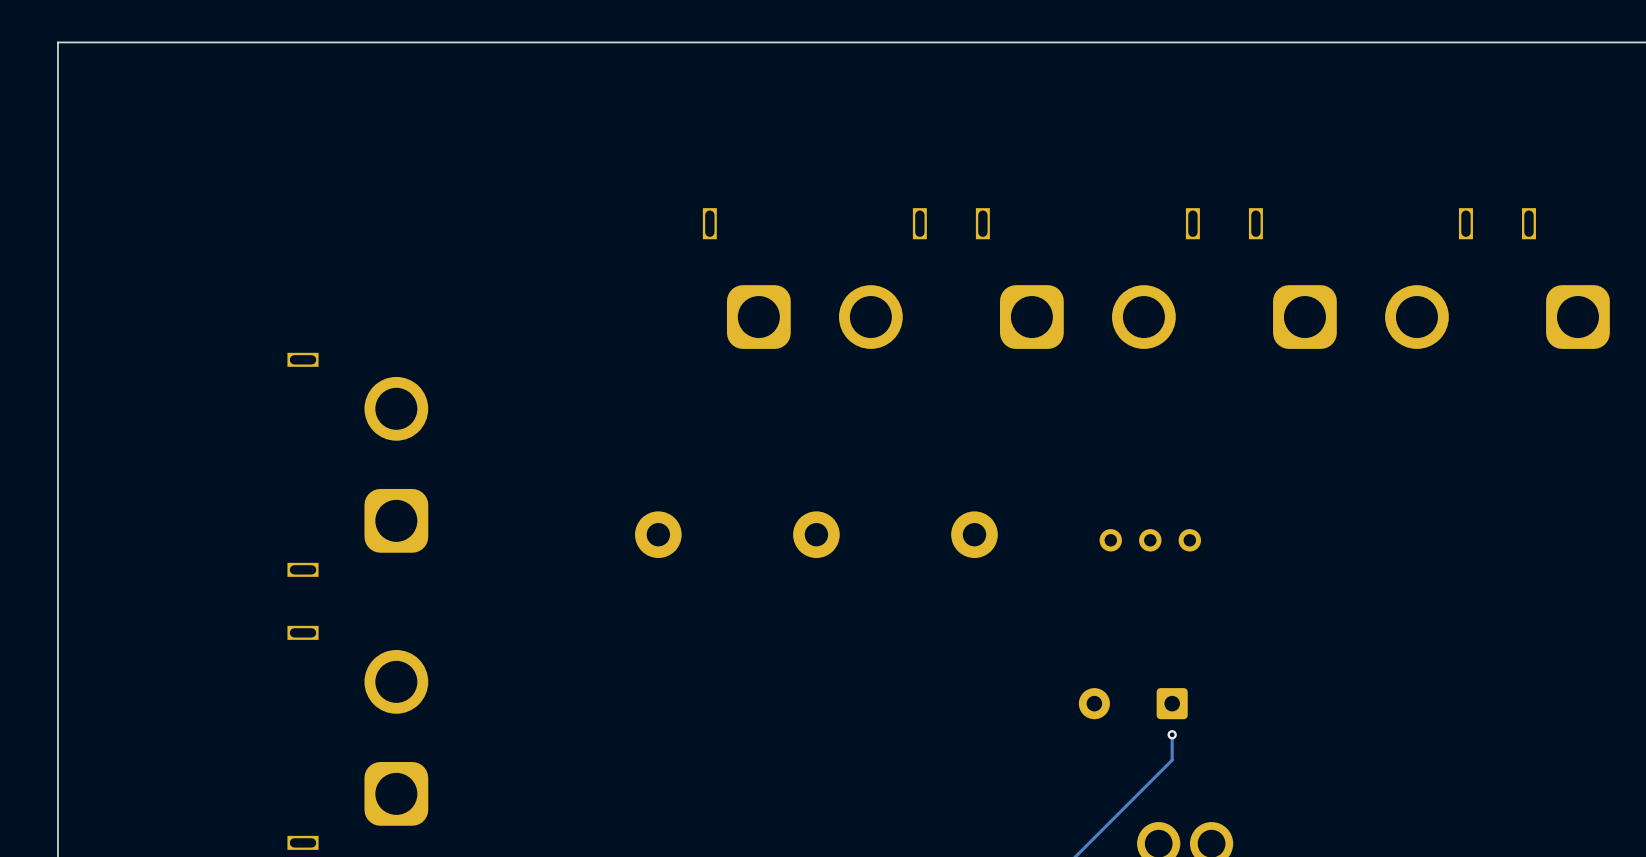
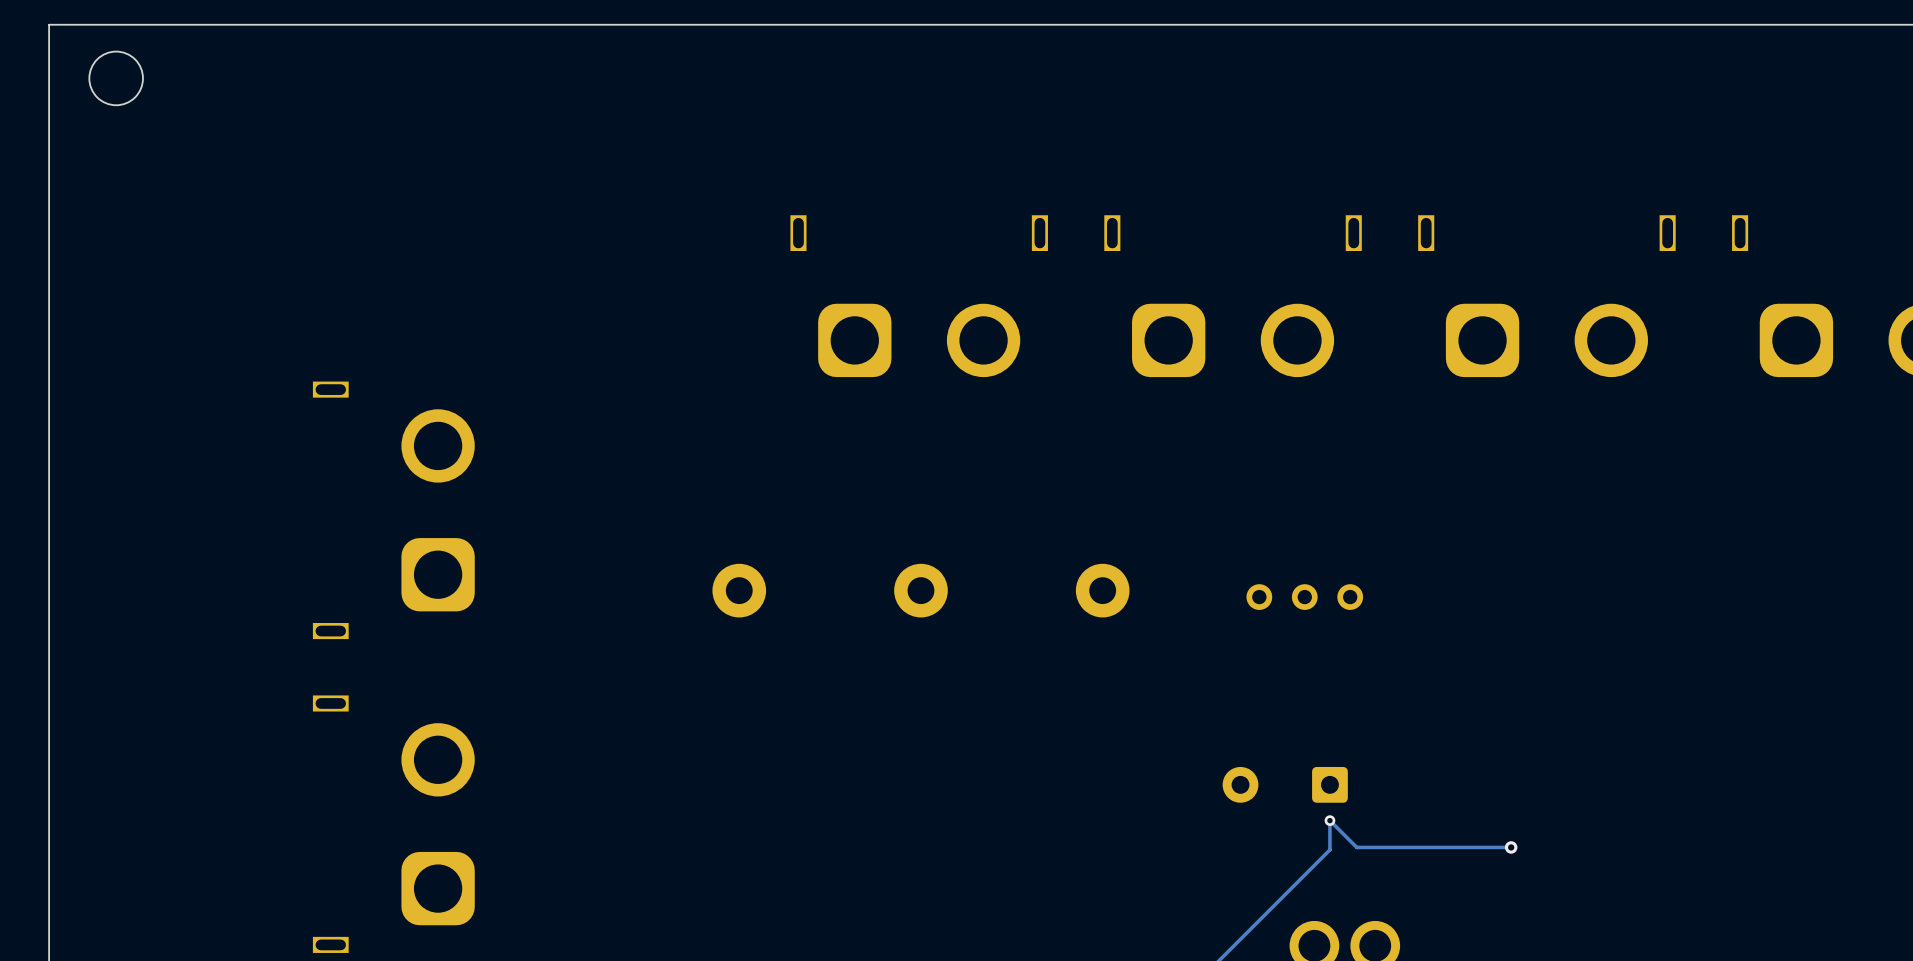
round board edge: none -> [88, 51, 144, 106]
track: none -> (1329, 820) (1356, 847) (1511, 847)
via: none -> (1511, 847)

